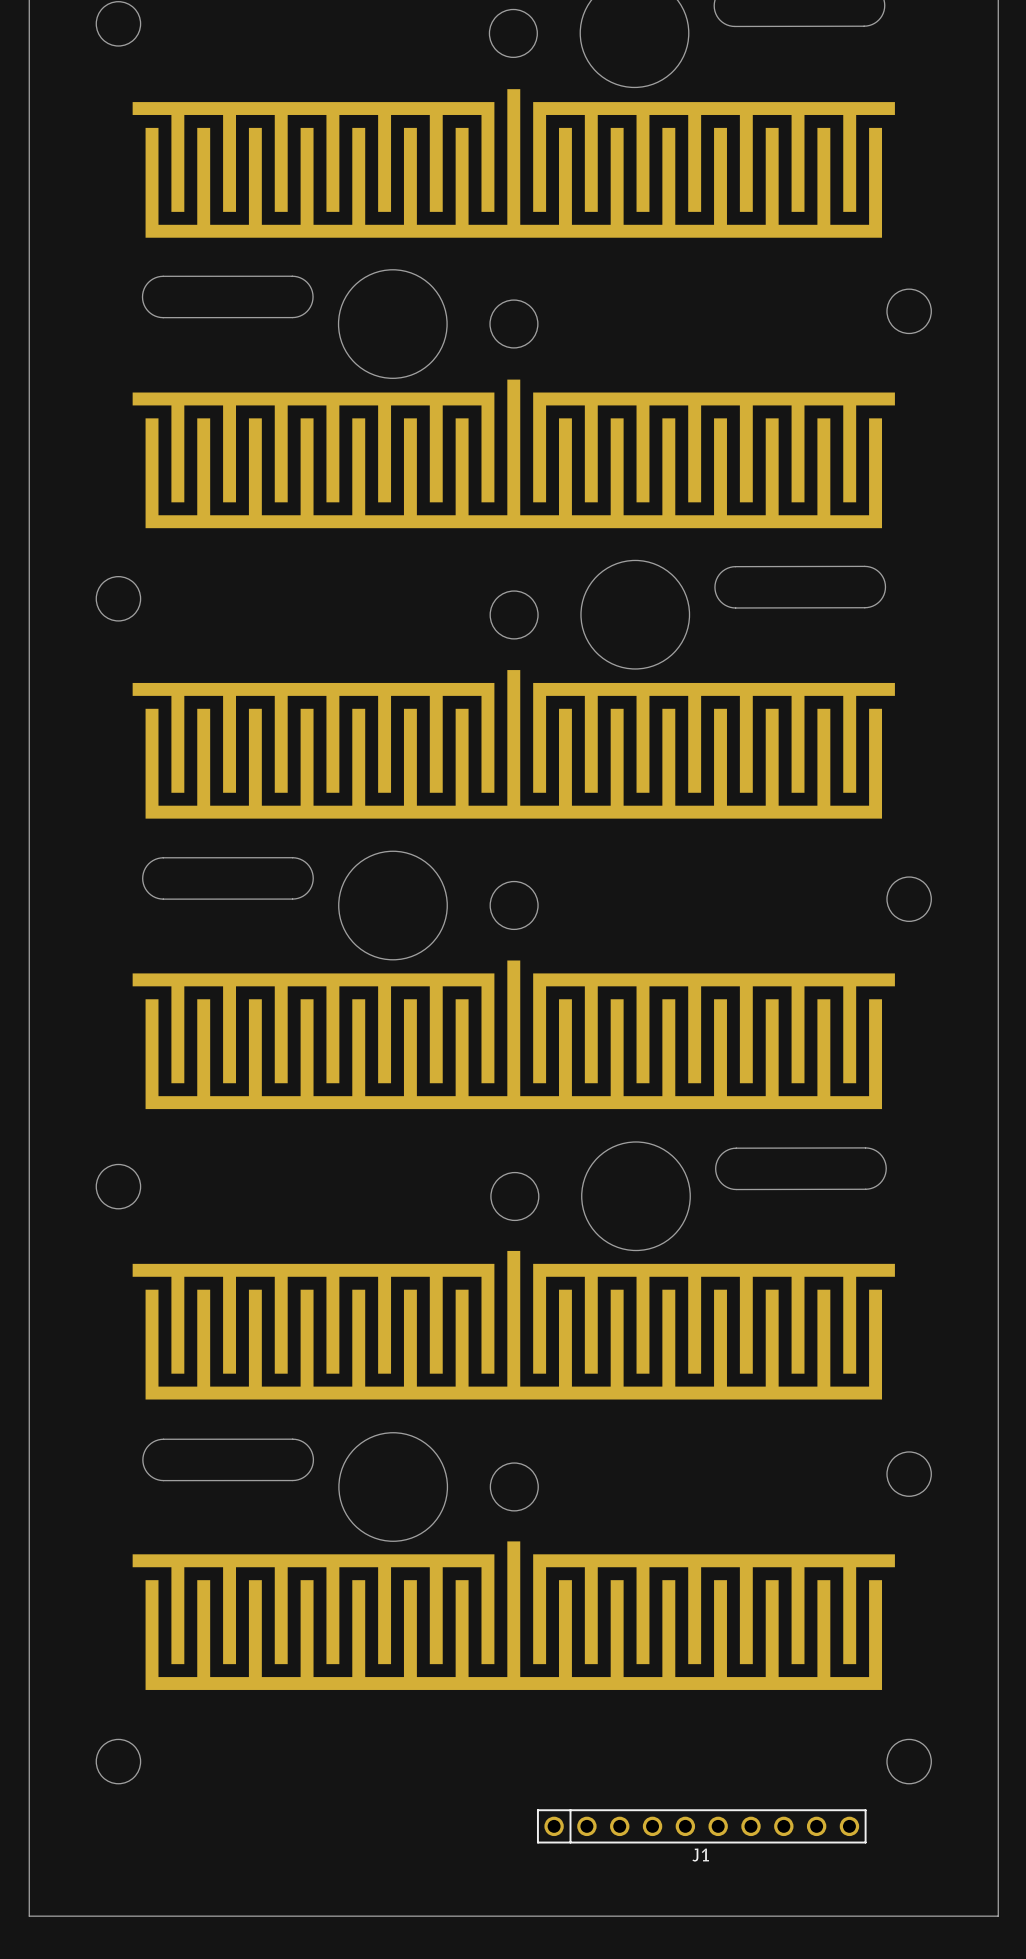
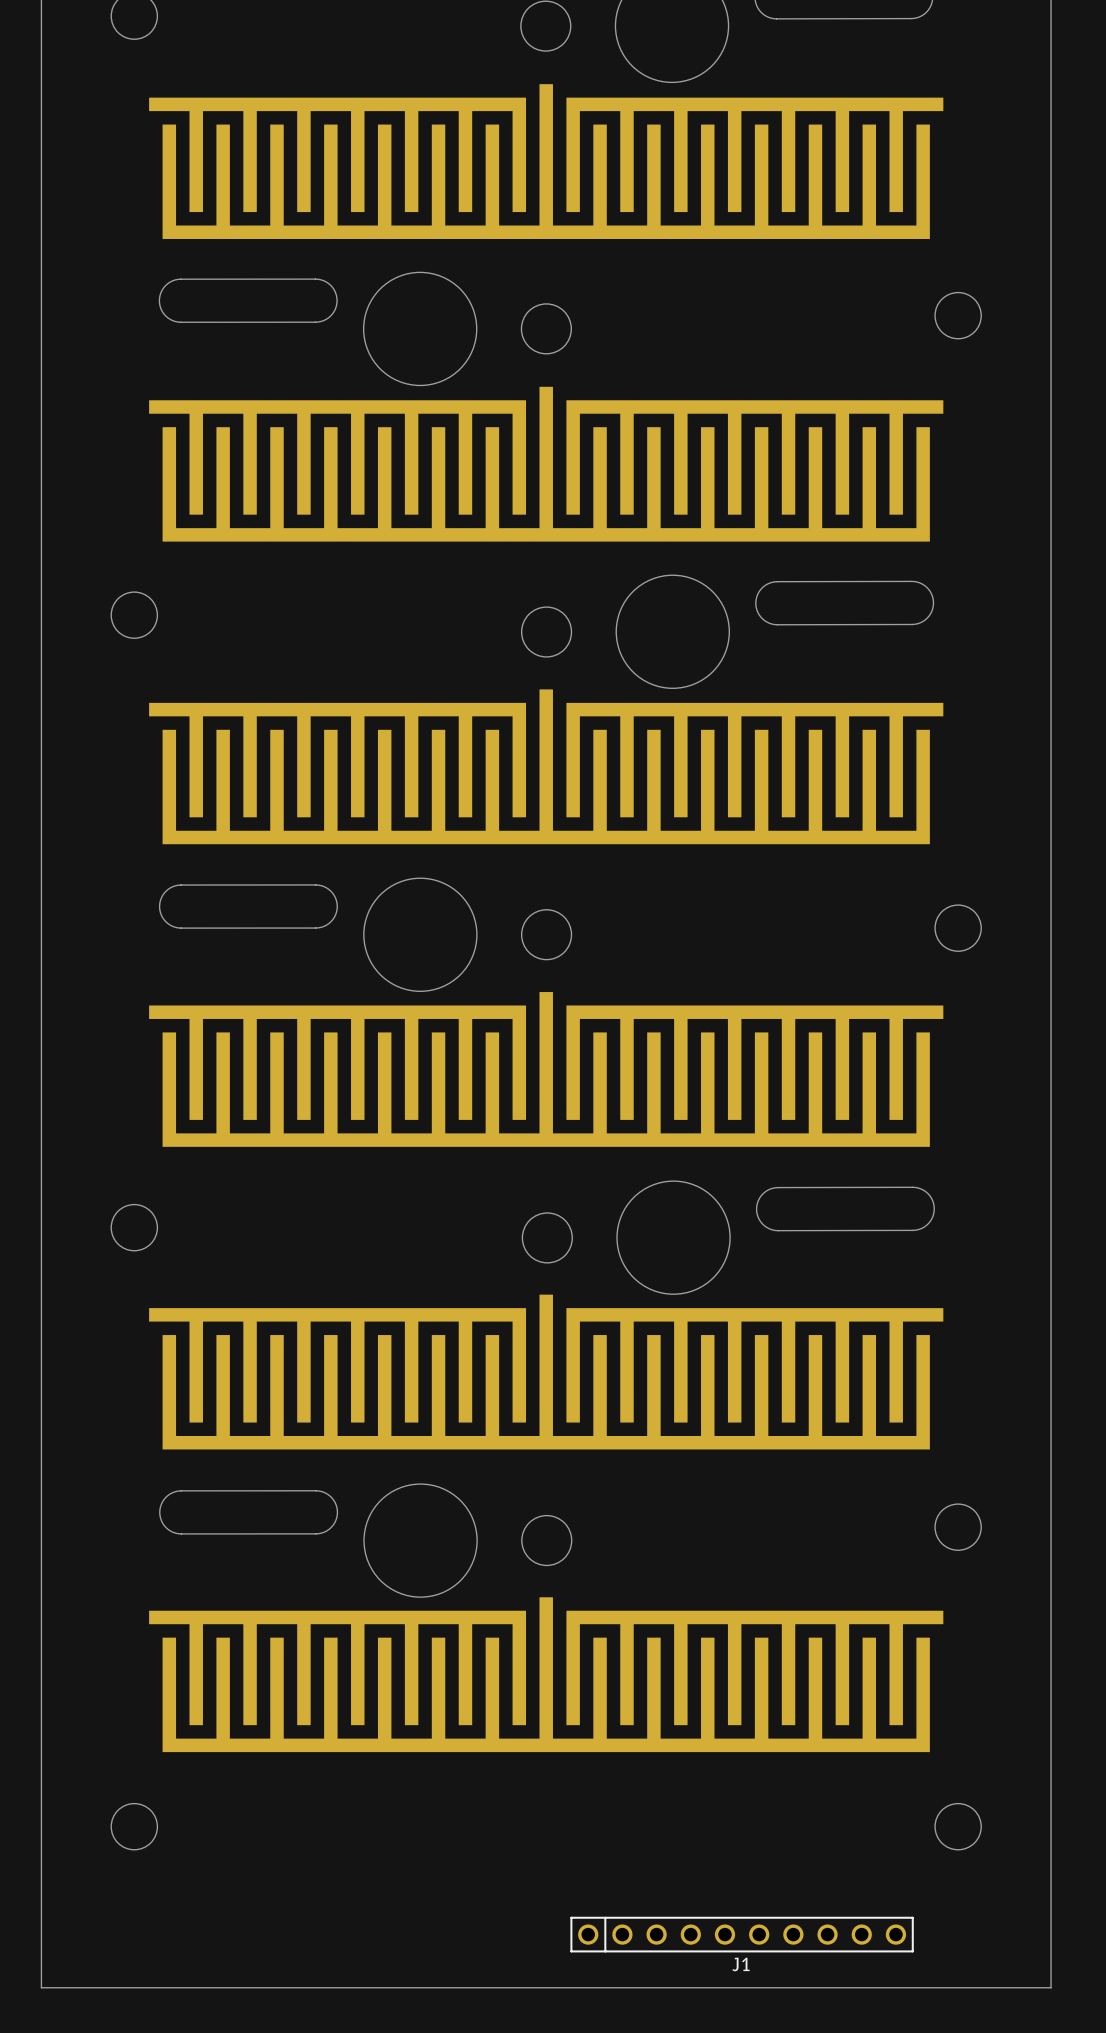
J1 position: (701, 1826) -> (742, 1934)

